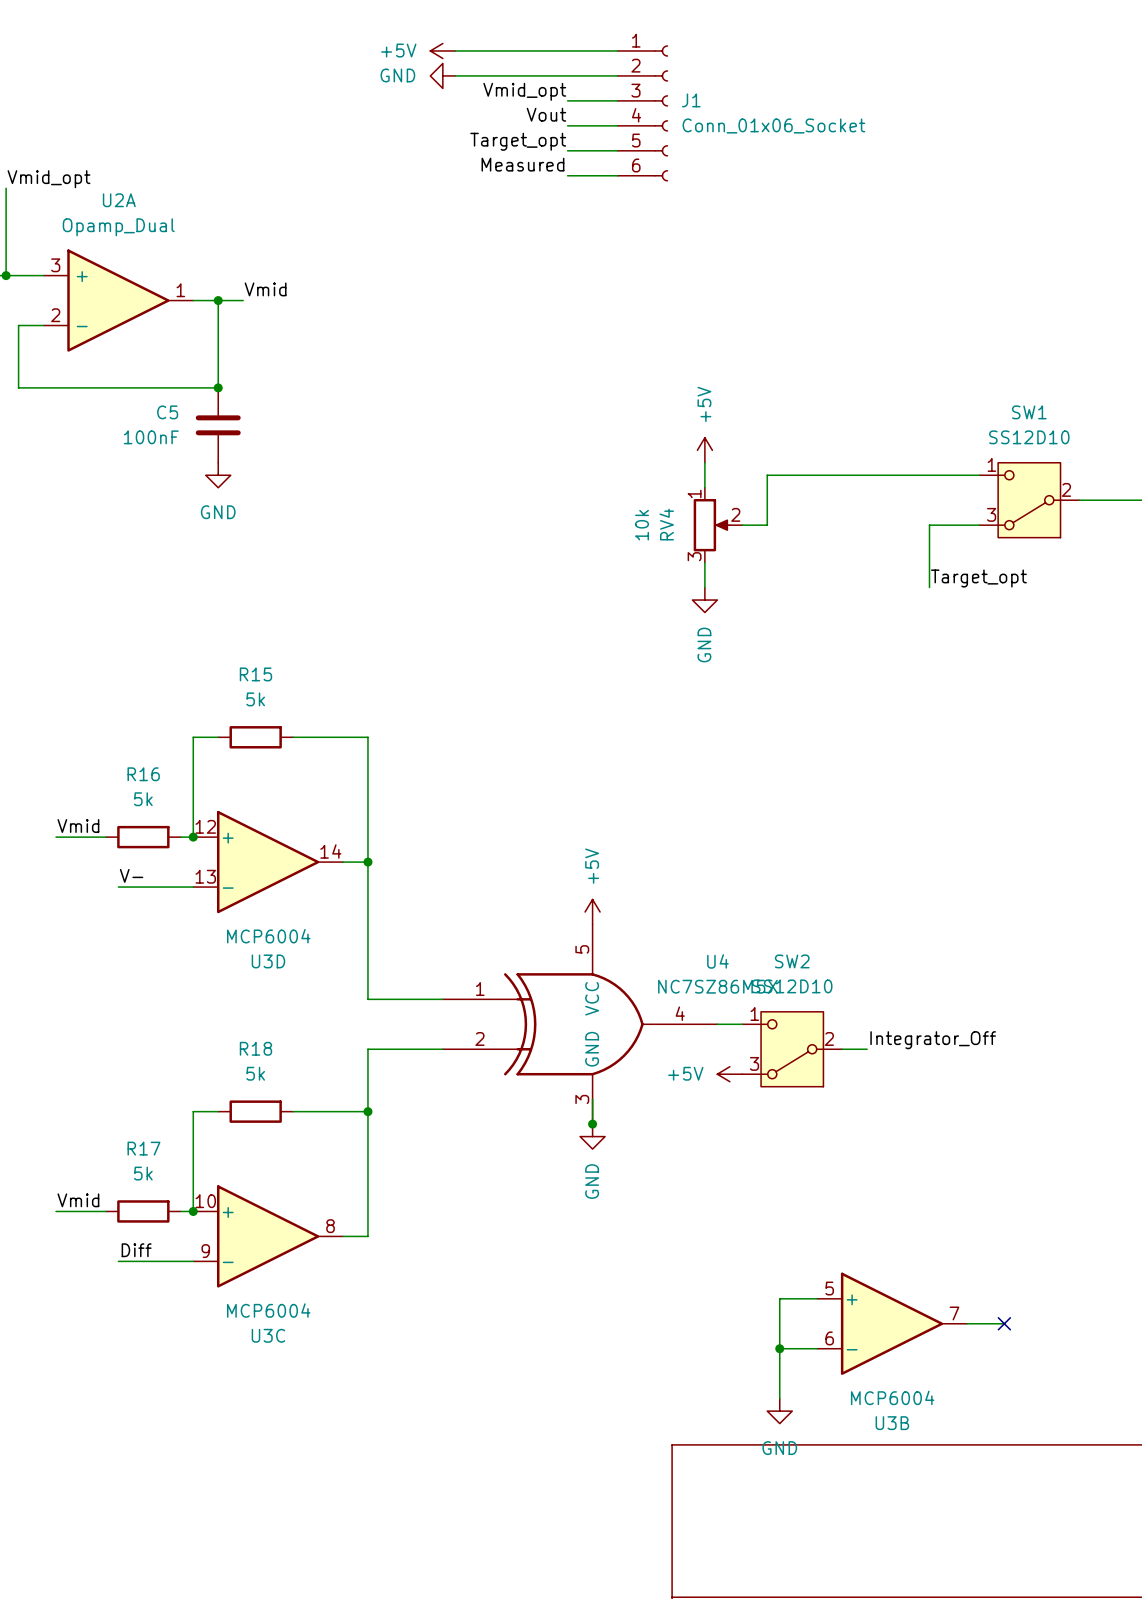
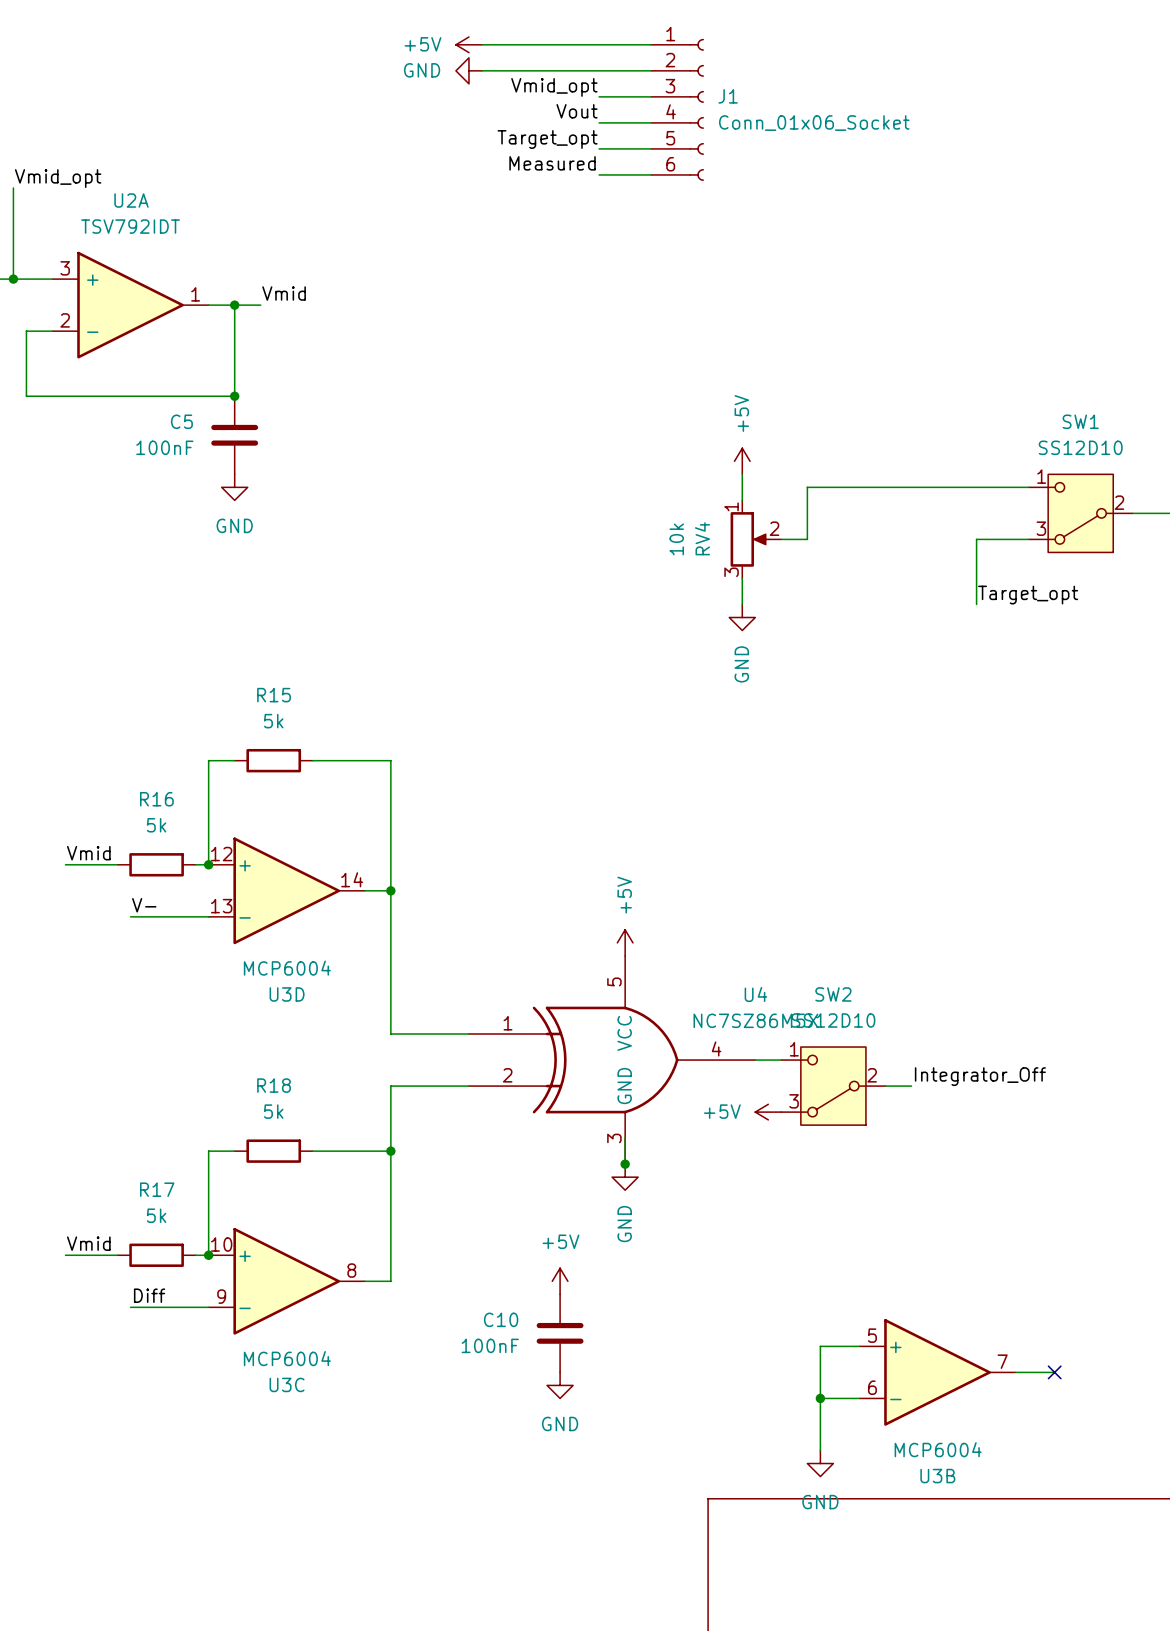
U2A value: Opamp_Dual (118, 227) -> TSV792IDT (130, 226)
power symbol: none -> +5V (560, 1281)
C10: none -> 100nF (560, 1333)
power symbol: none -> GND (560, 1385)

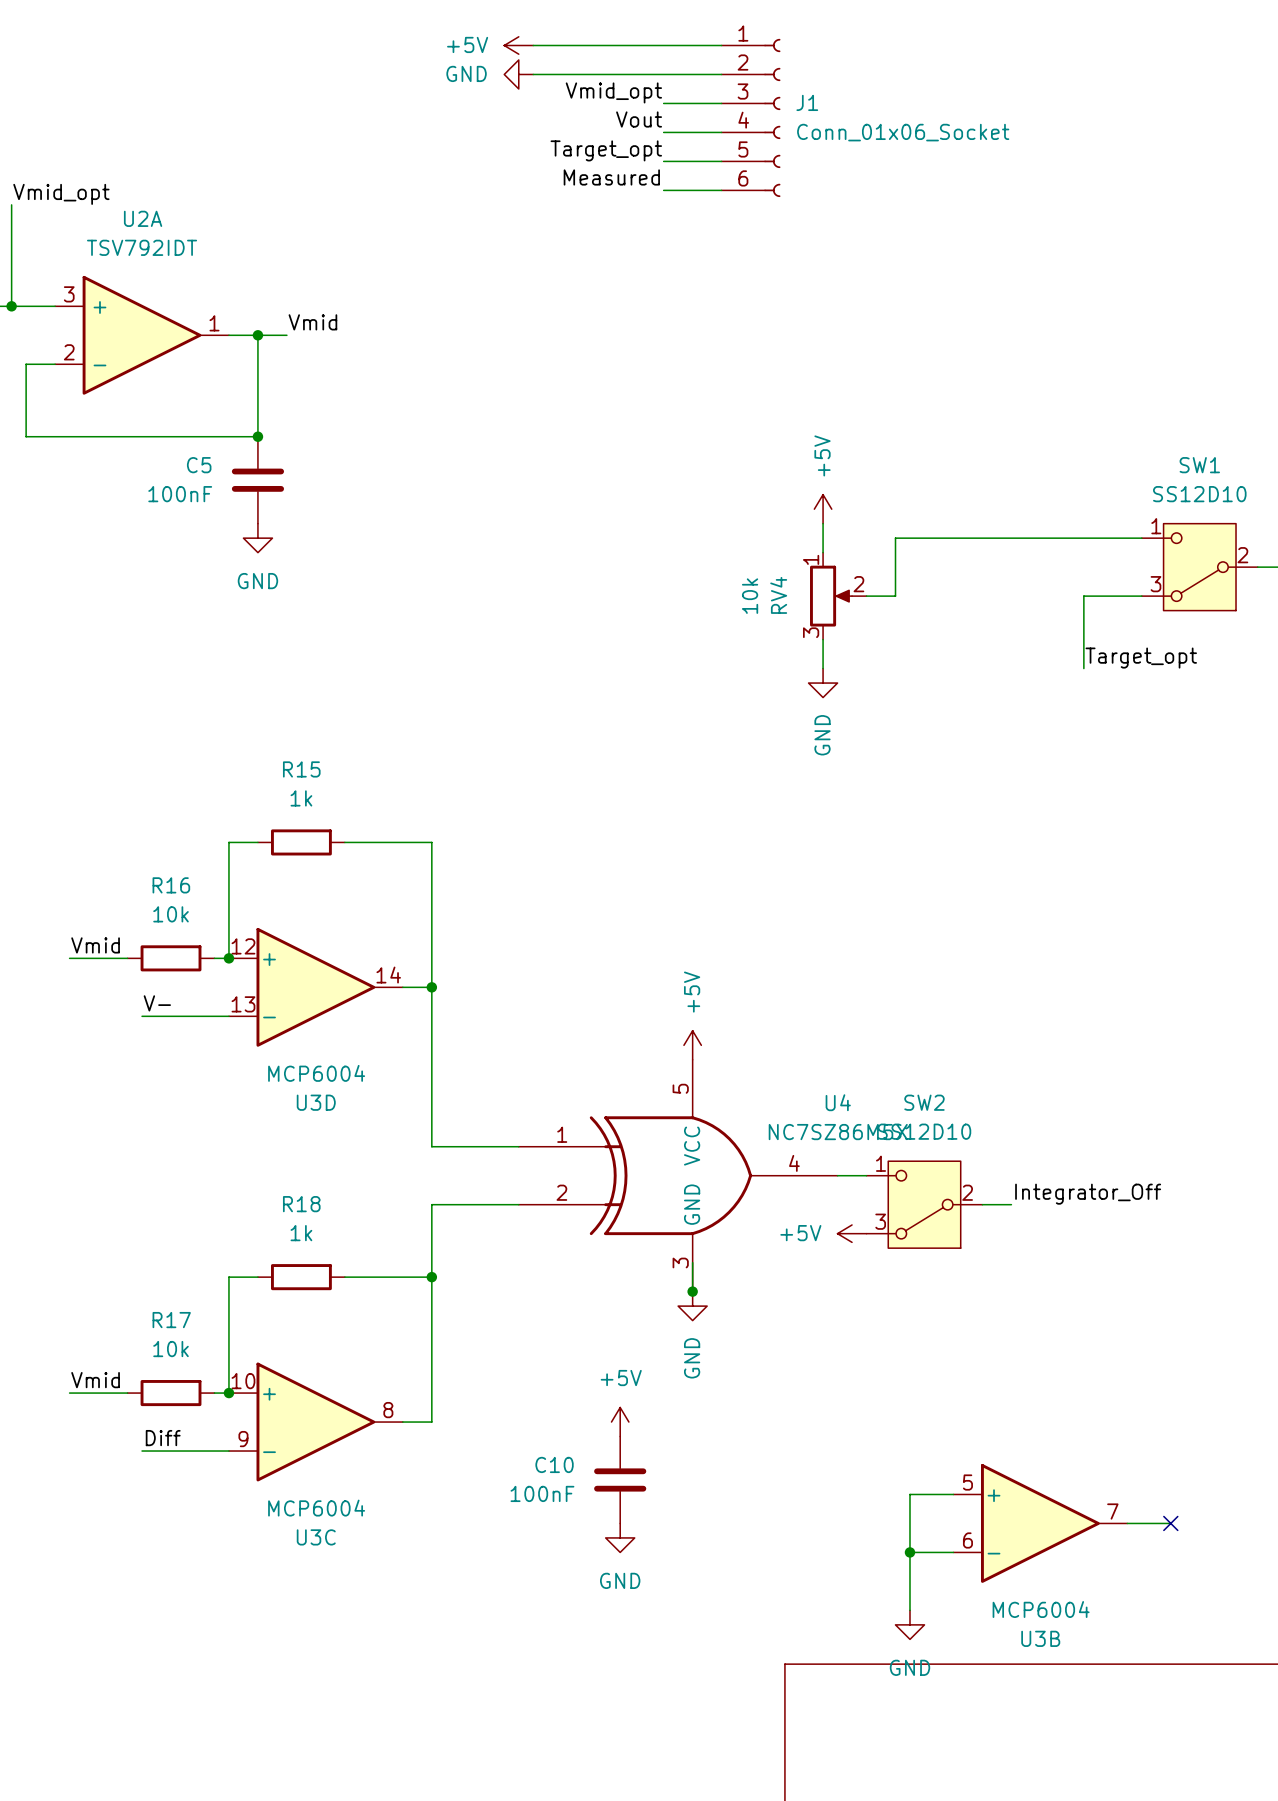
R15 value: 5k (273, 721) -> 1k (301, 798)
R16 value: 5k (156, 825) -> 10k (171, 914)
R18 value: 5k (273, 1111) -> 1k (301, 1233)
R17 value: 5k (156, 1215) -> 10k (171, 1349)

